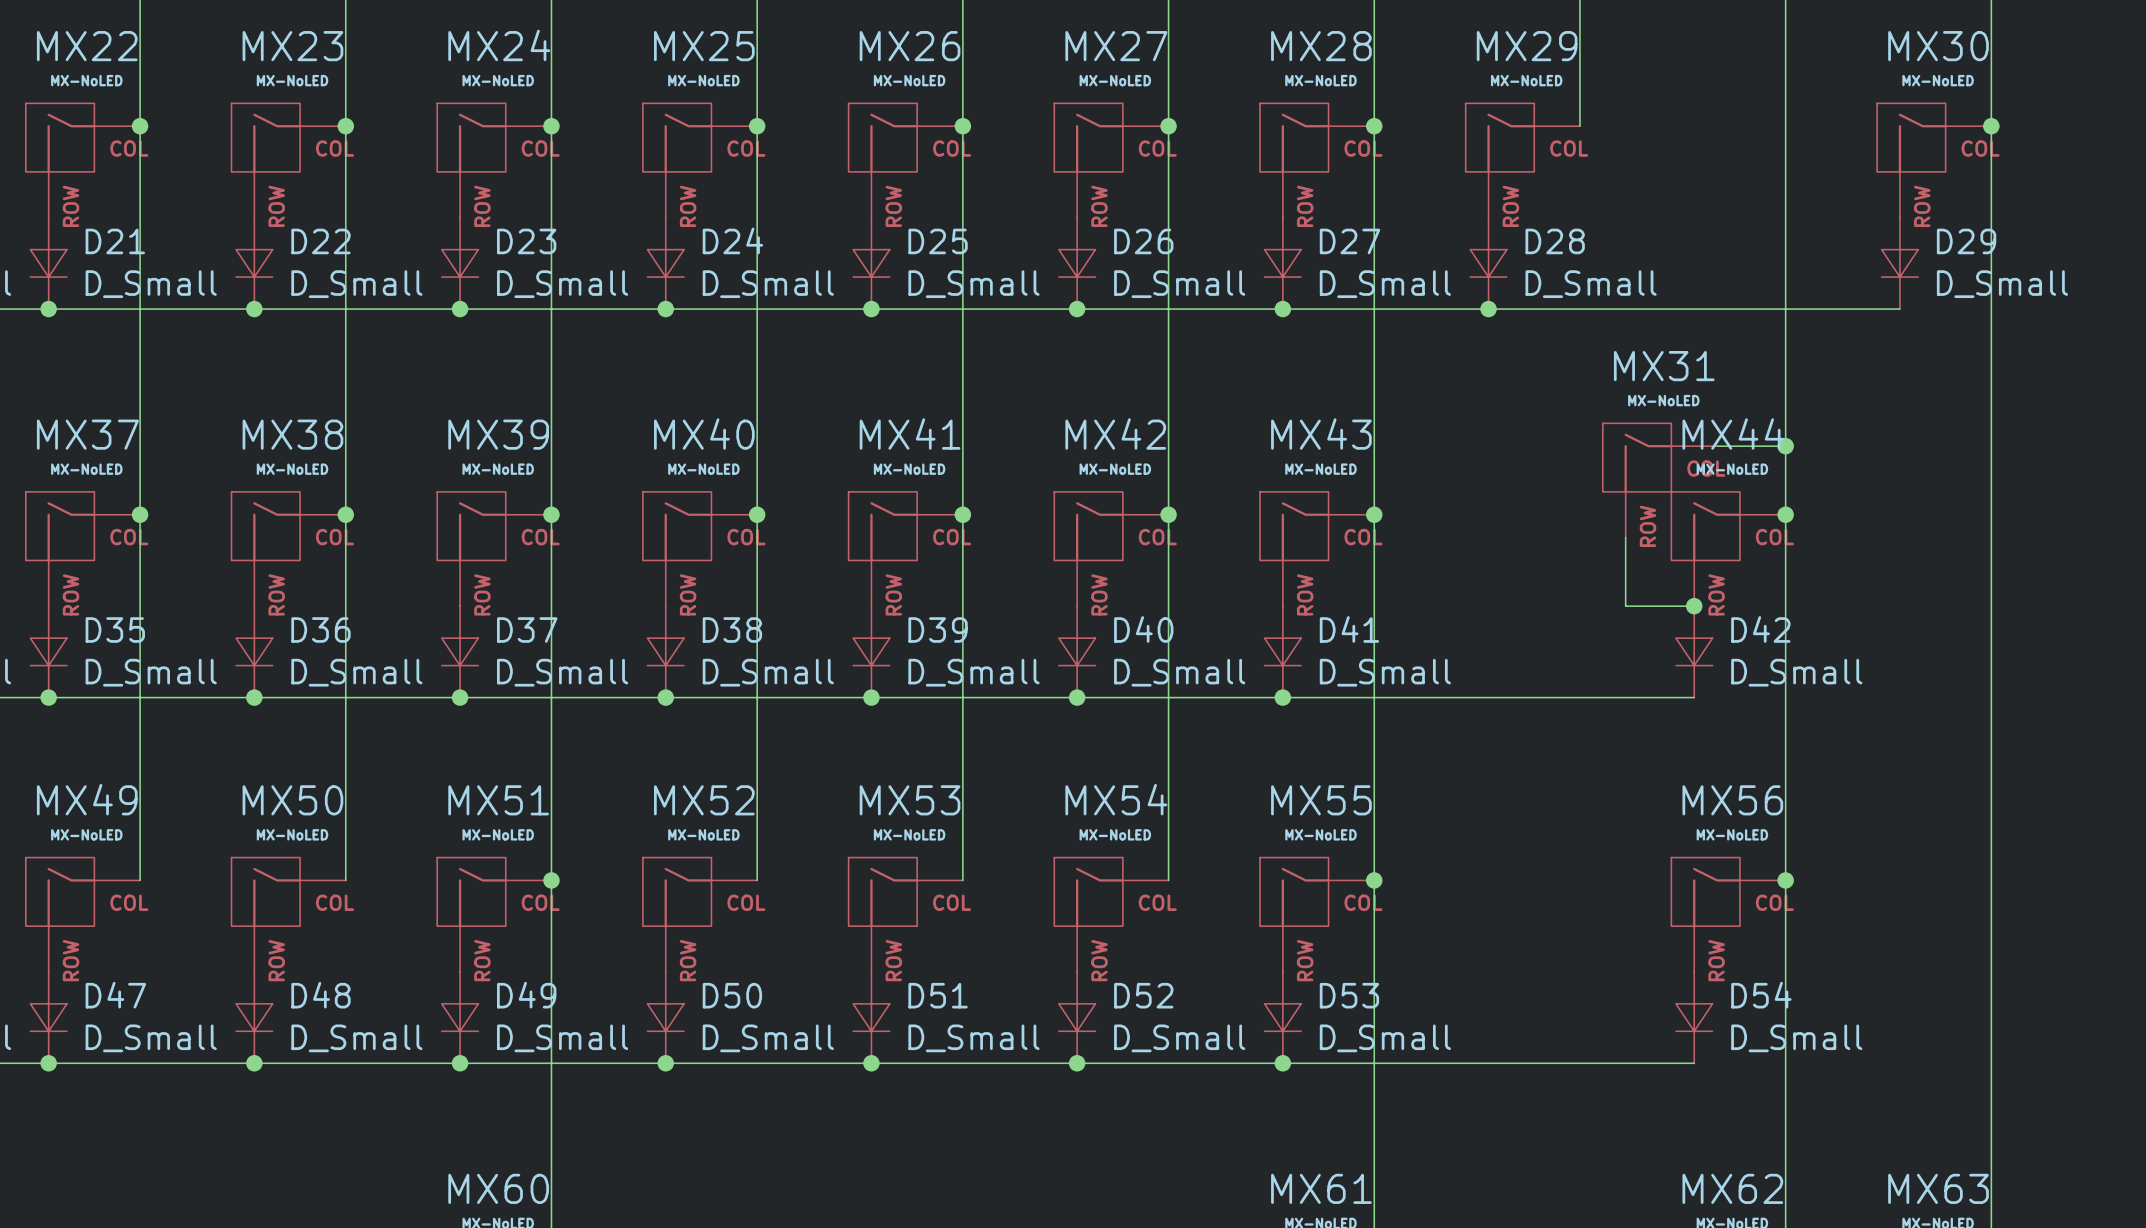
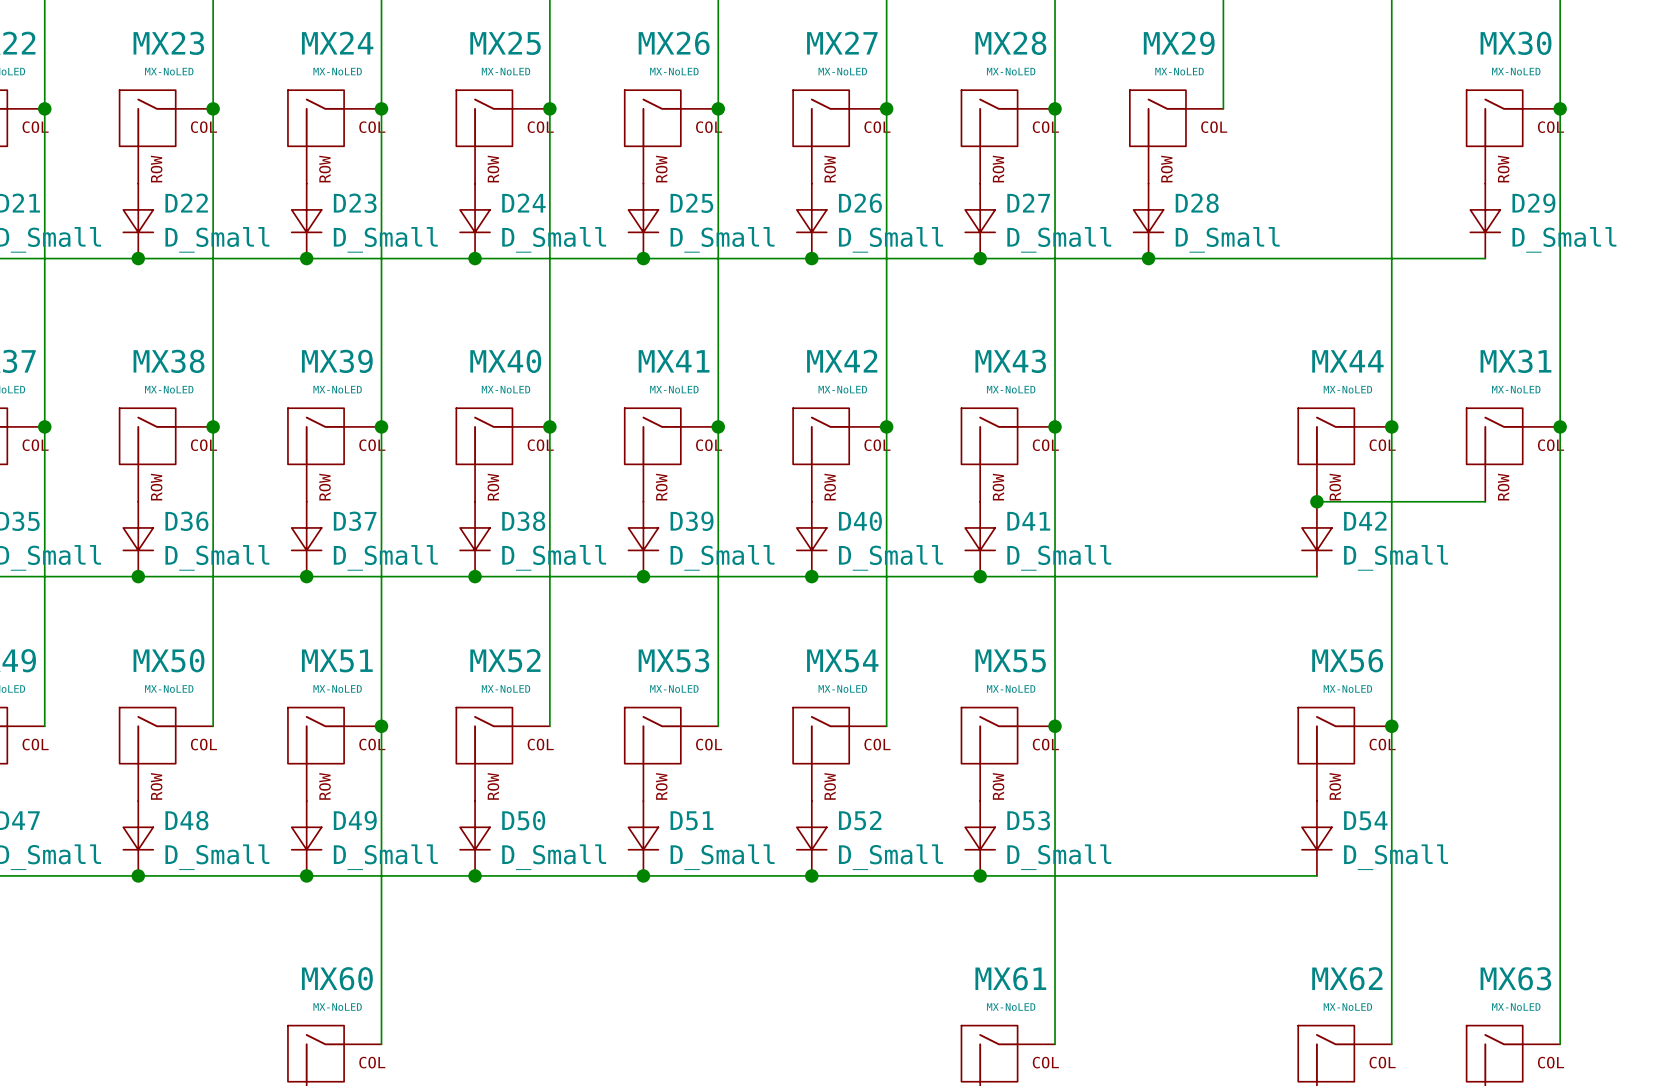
wire: (1717, 446) (1785, 446) -> none
junction: (1785, 446) -> none
MX31 position: (1659, 480) -> (1513, 455)
junction: none -> (1560, 426)
wire: (1625, 537) (1625, 606) (1694, 606) -> (1485, 501) (1316, 501)

